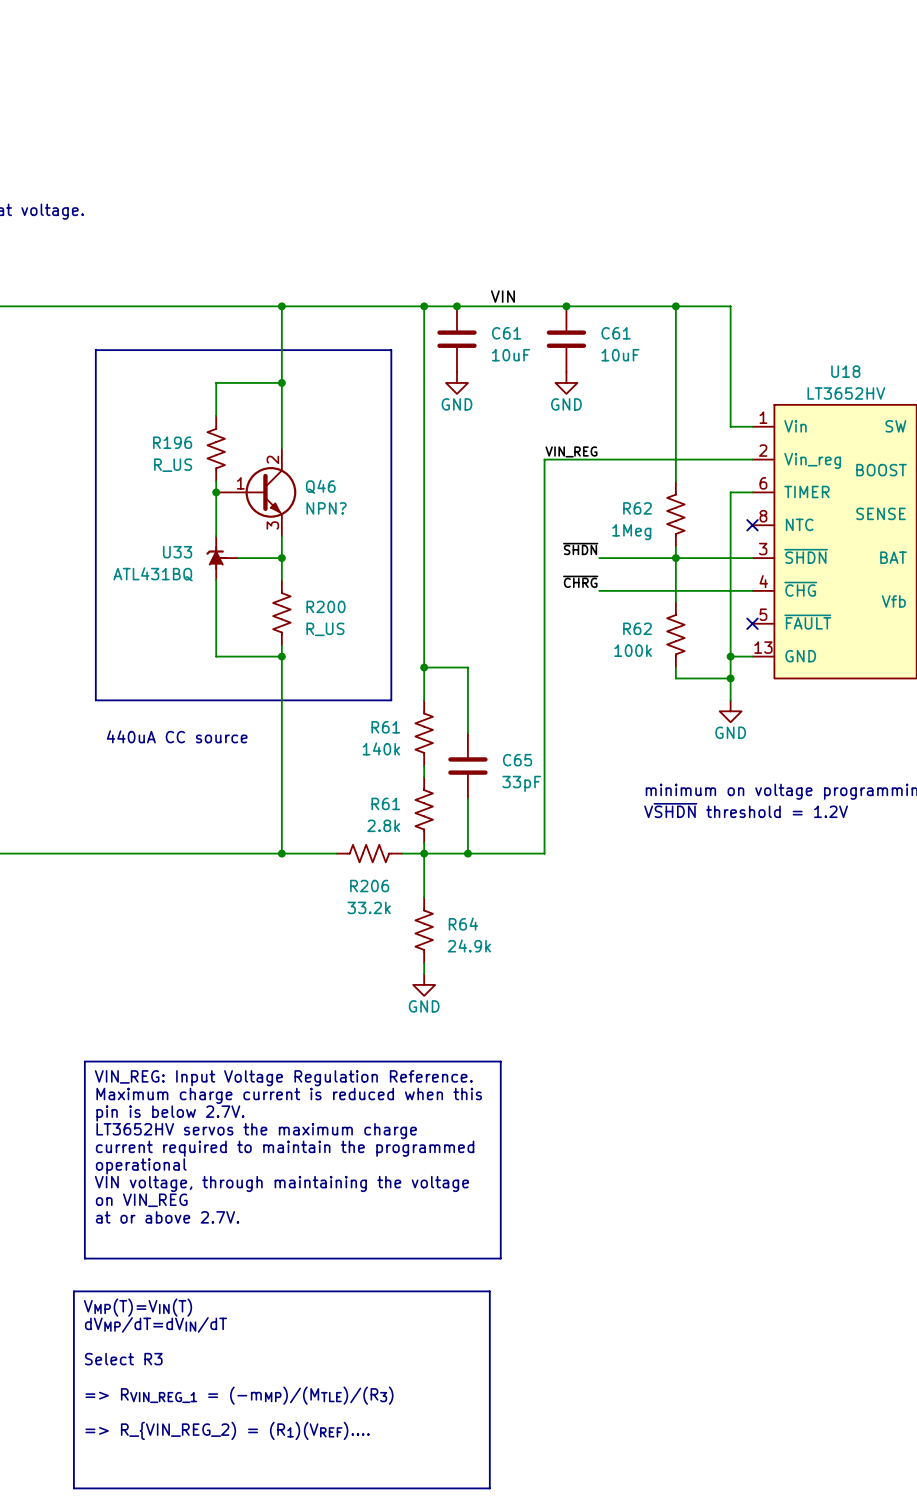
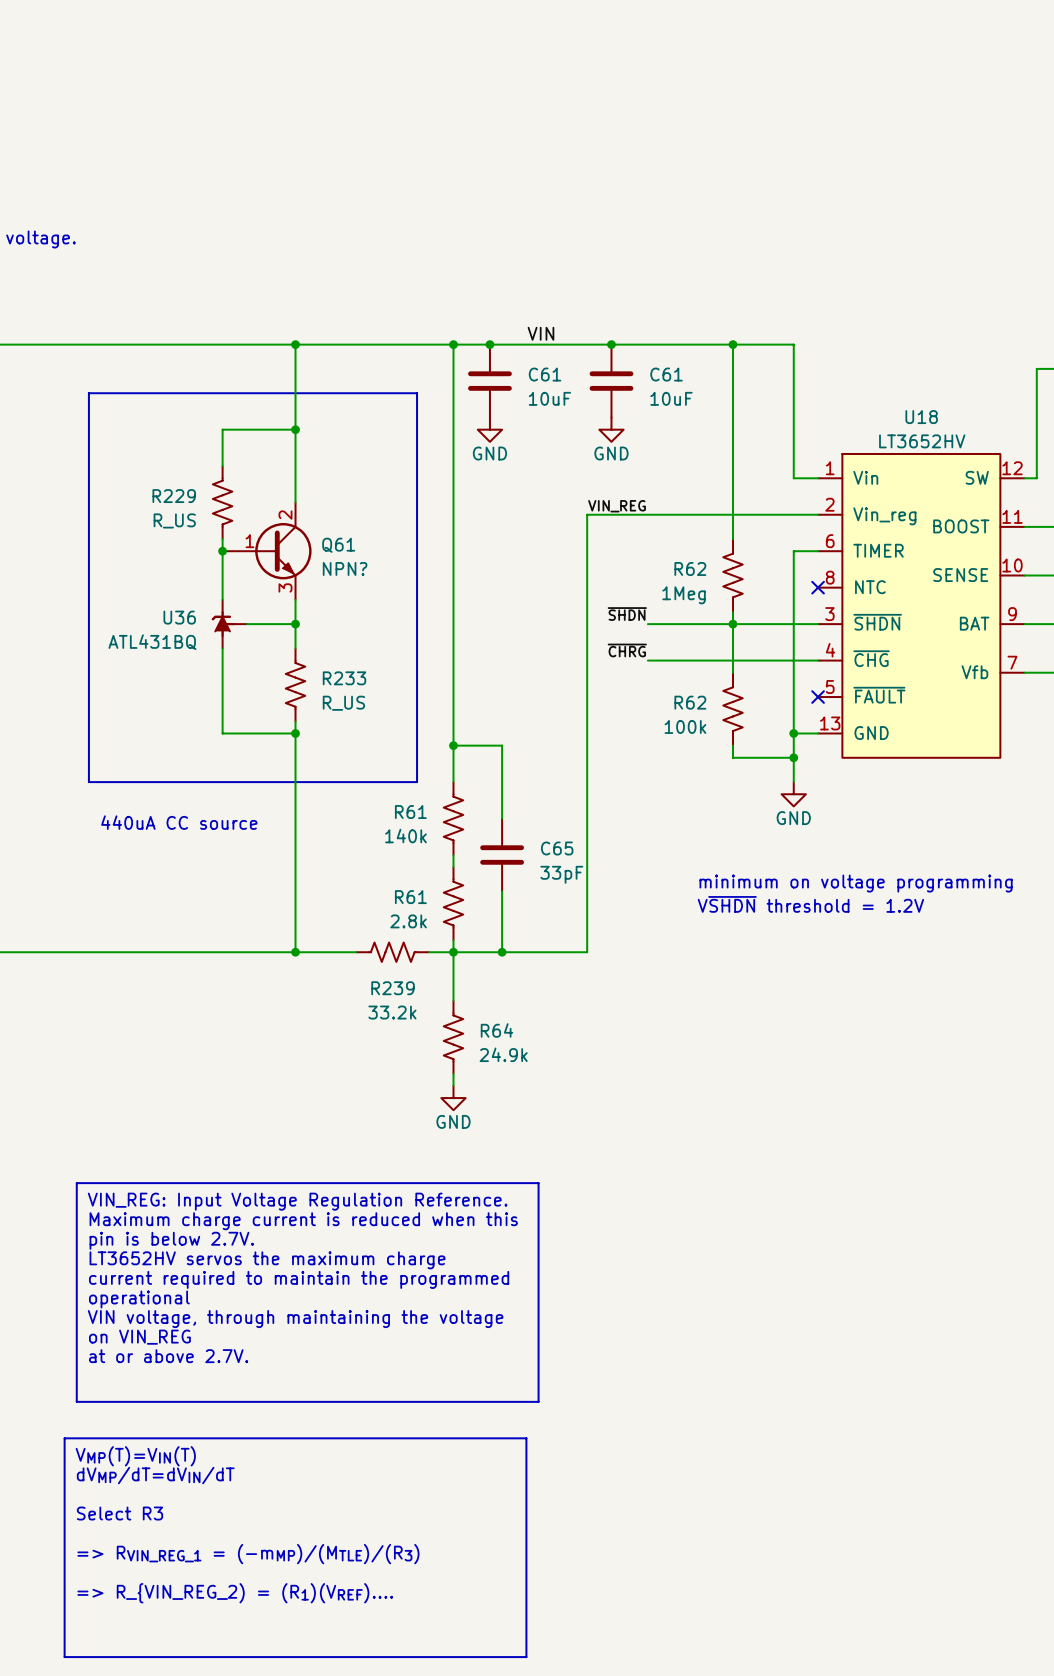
R196 name: R196 (172, 442) -> R229 (174, 496)
Q46 name: Q46 (320, 486) -> Q61 (338, 545)
U33 name: U33 (177, 552) -> U36 (179, 617)
R200 name: R200 (325, 606) -> R233 (344, 678)
R206 name: R206 (369, 886) -> R239 (393, 988)

